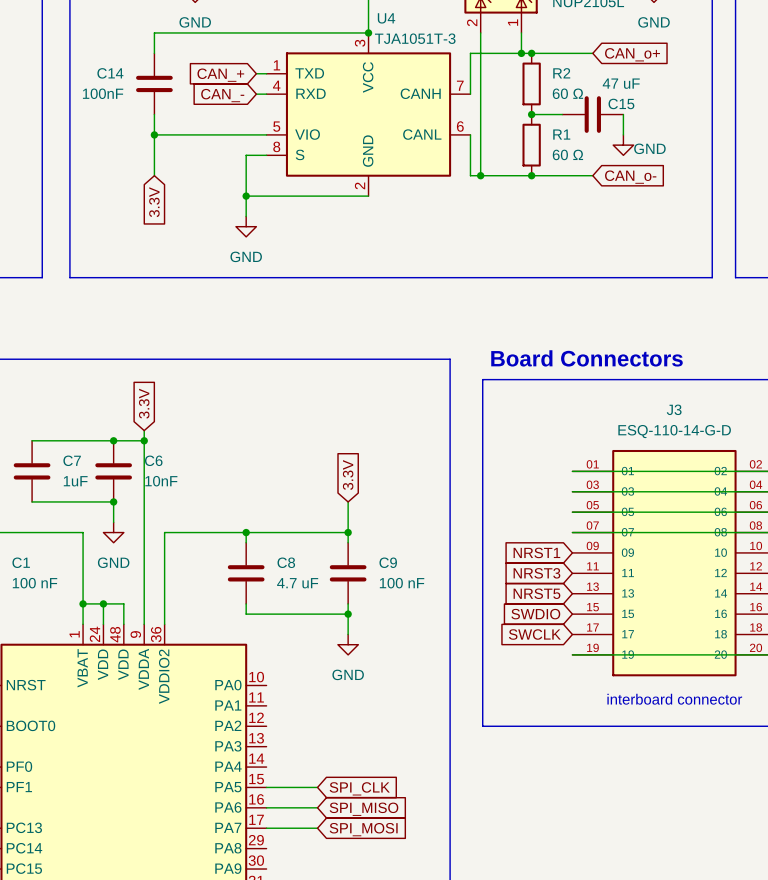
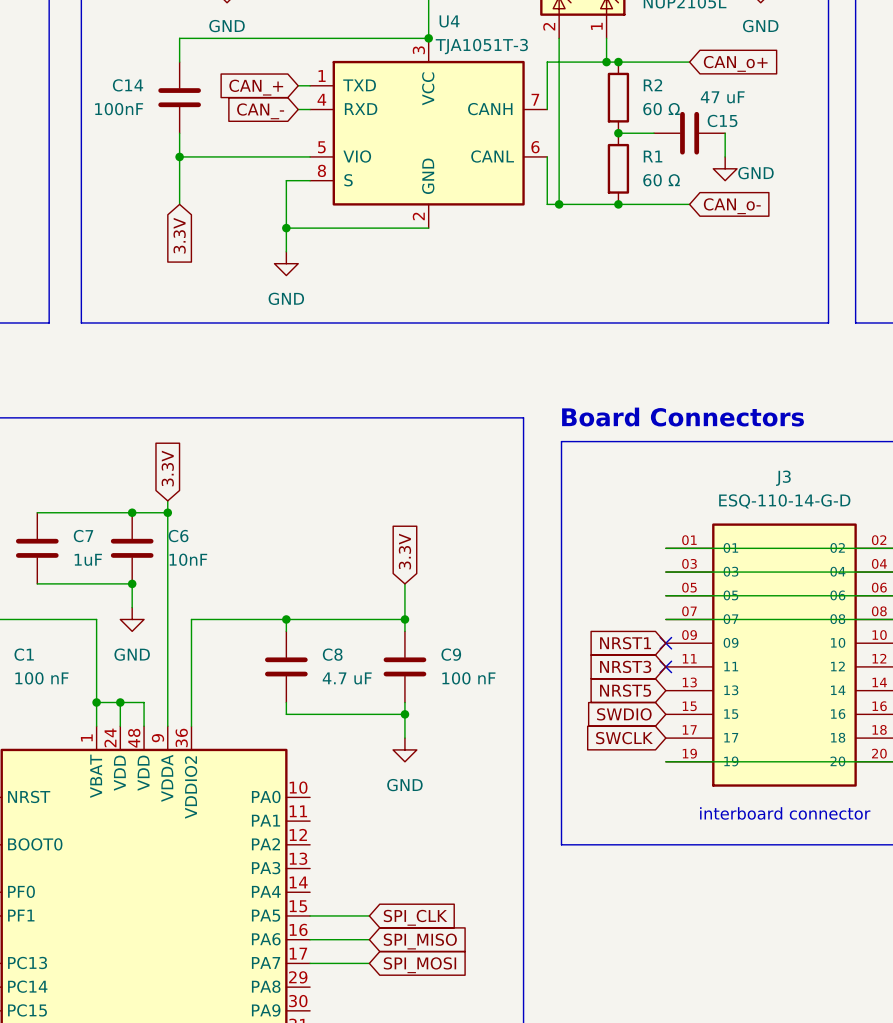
no-connect mark: none -> (665, 643)
no-connect mark: none -> (665, 666)

